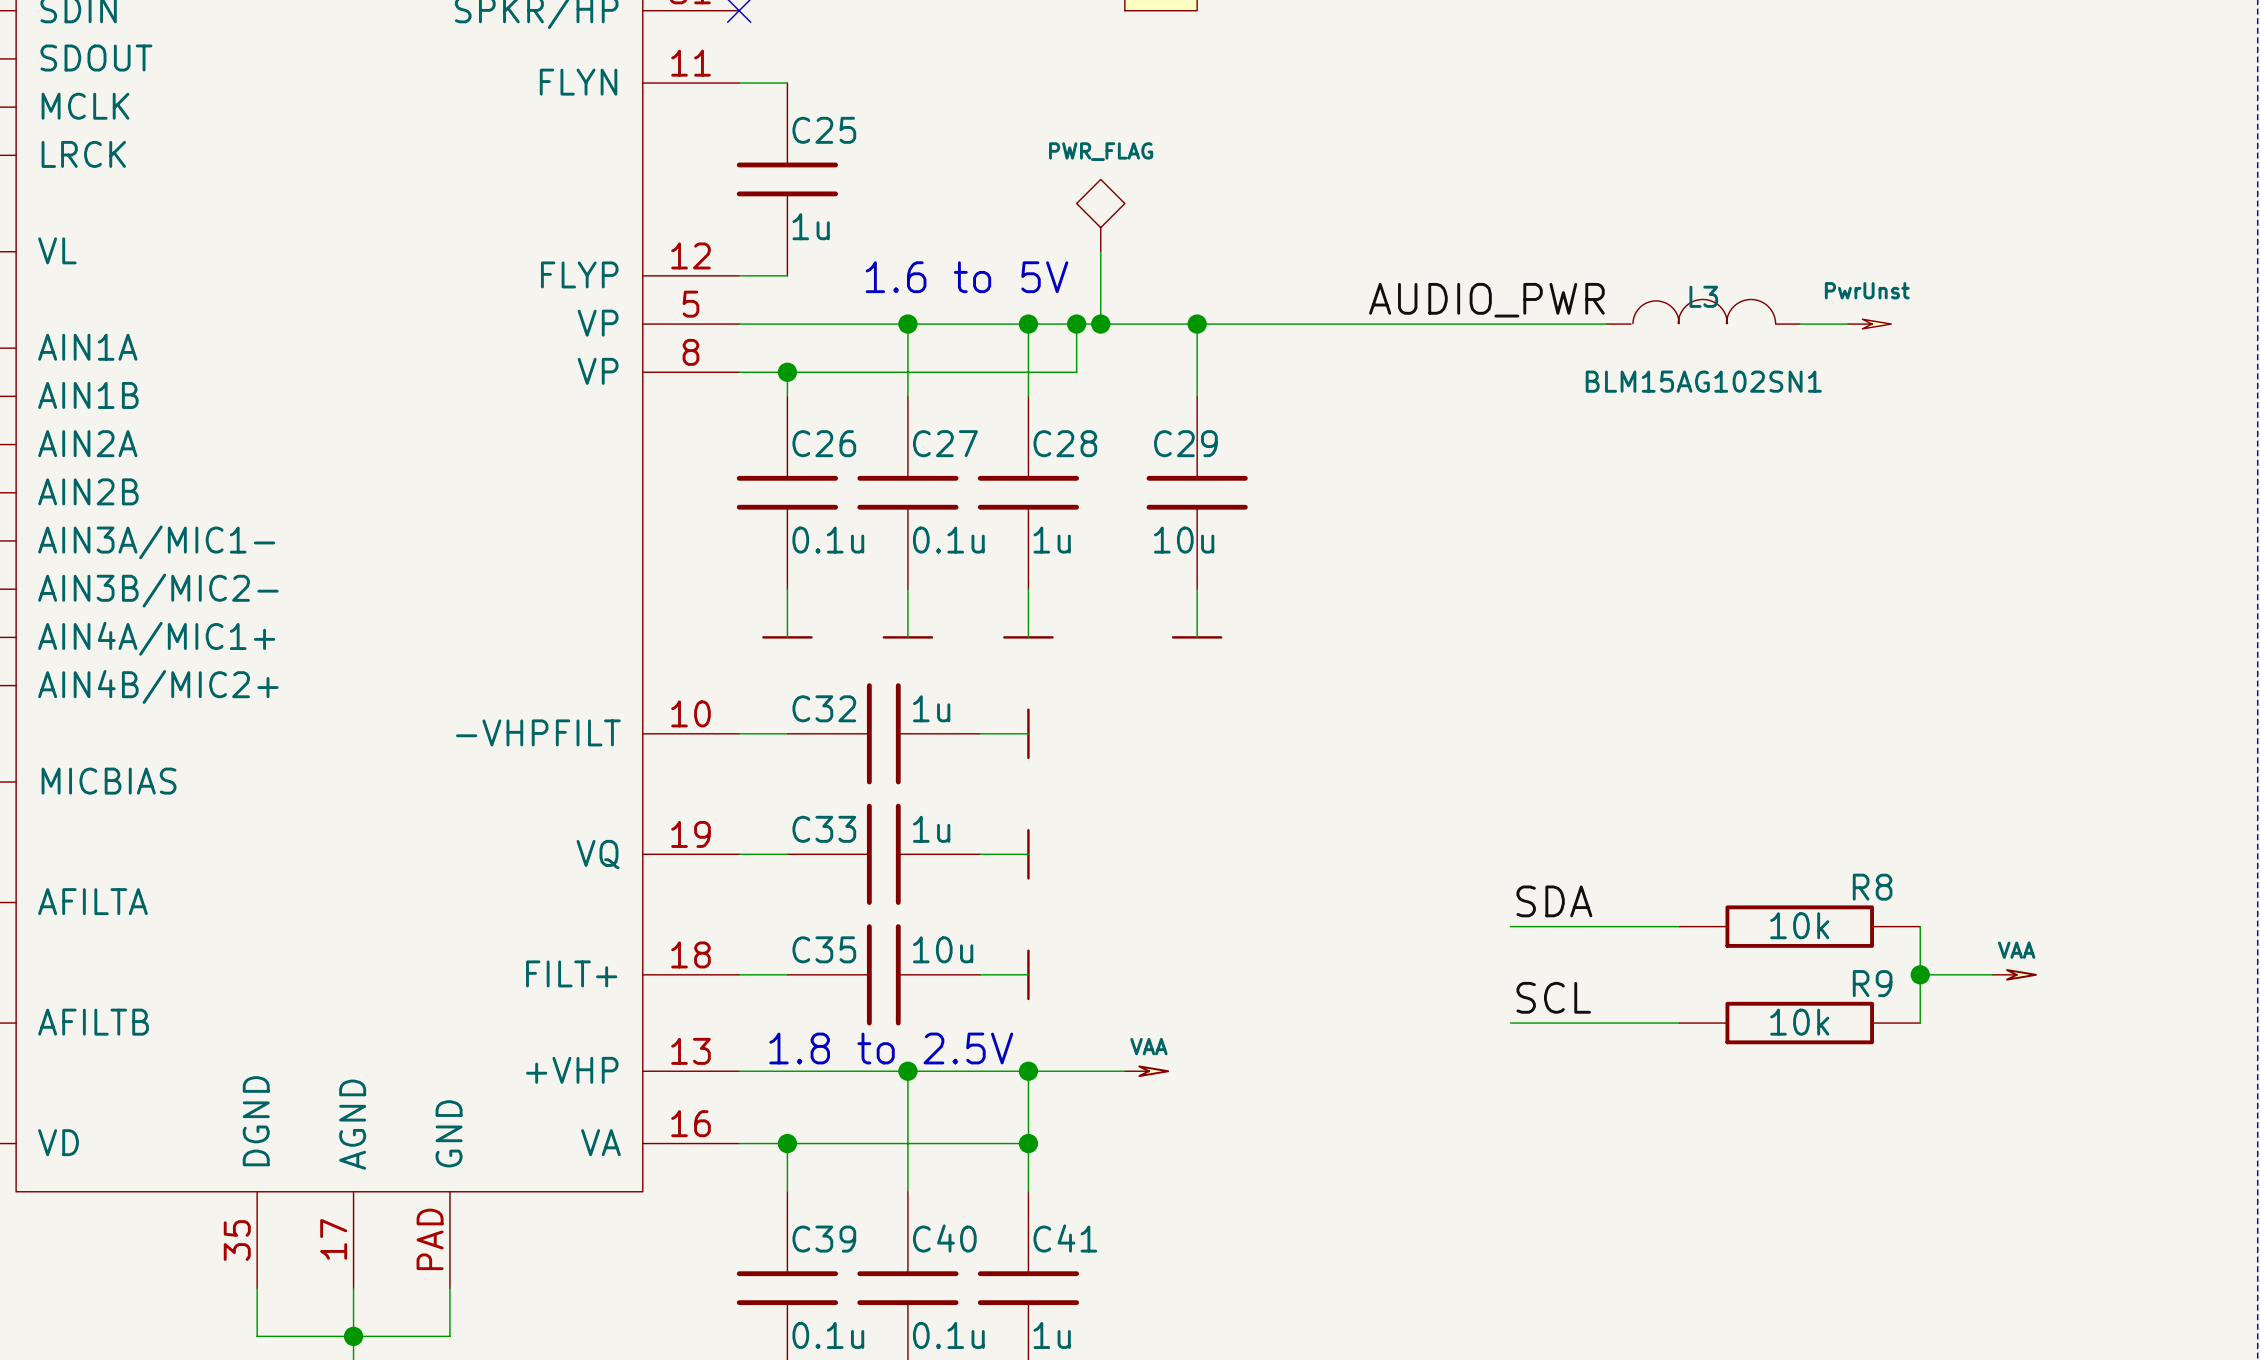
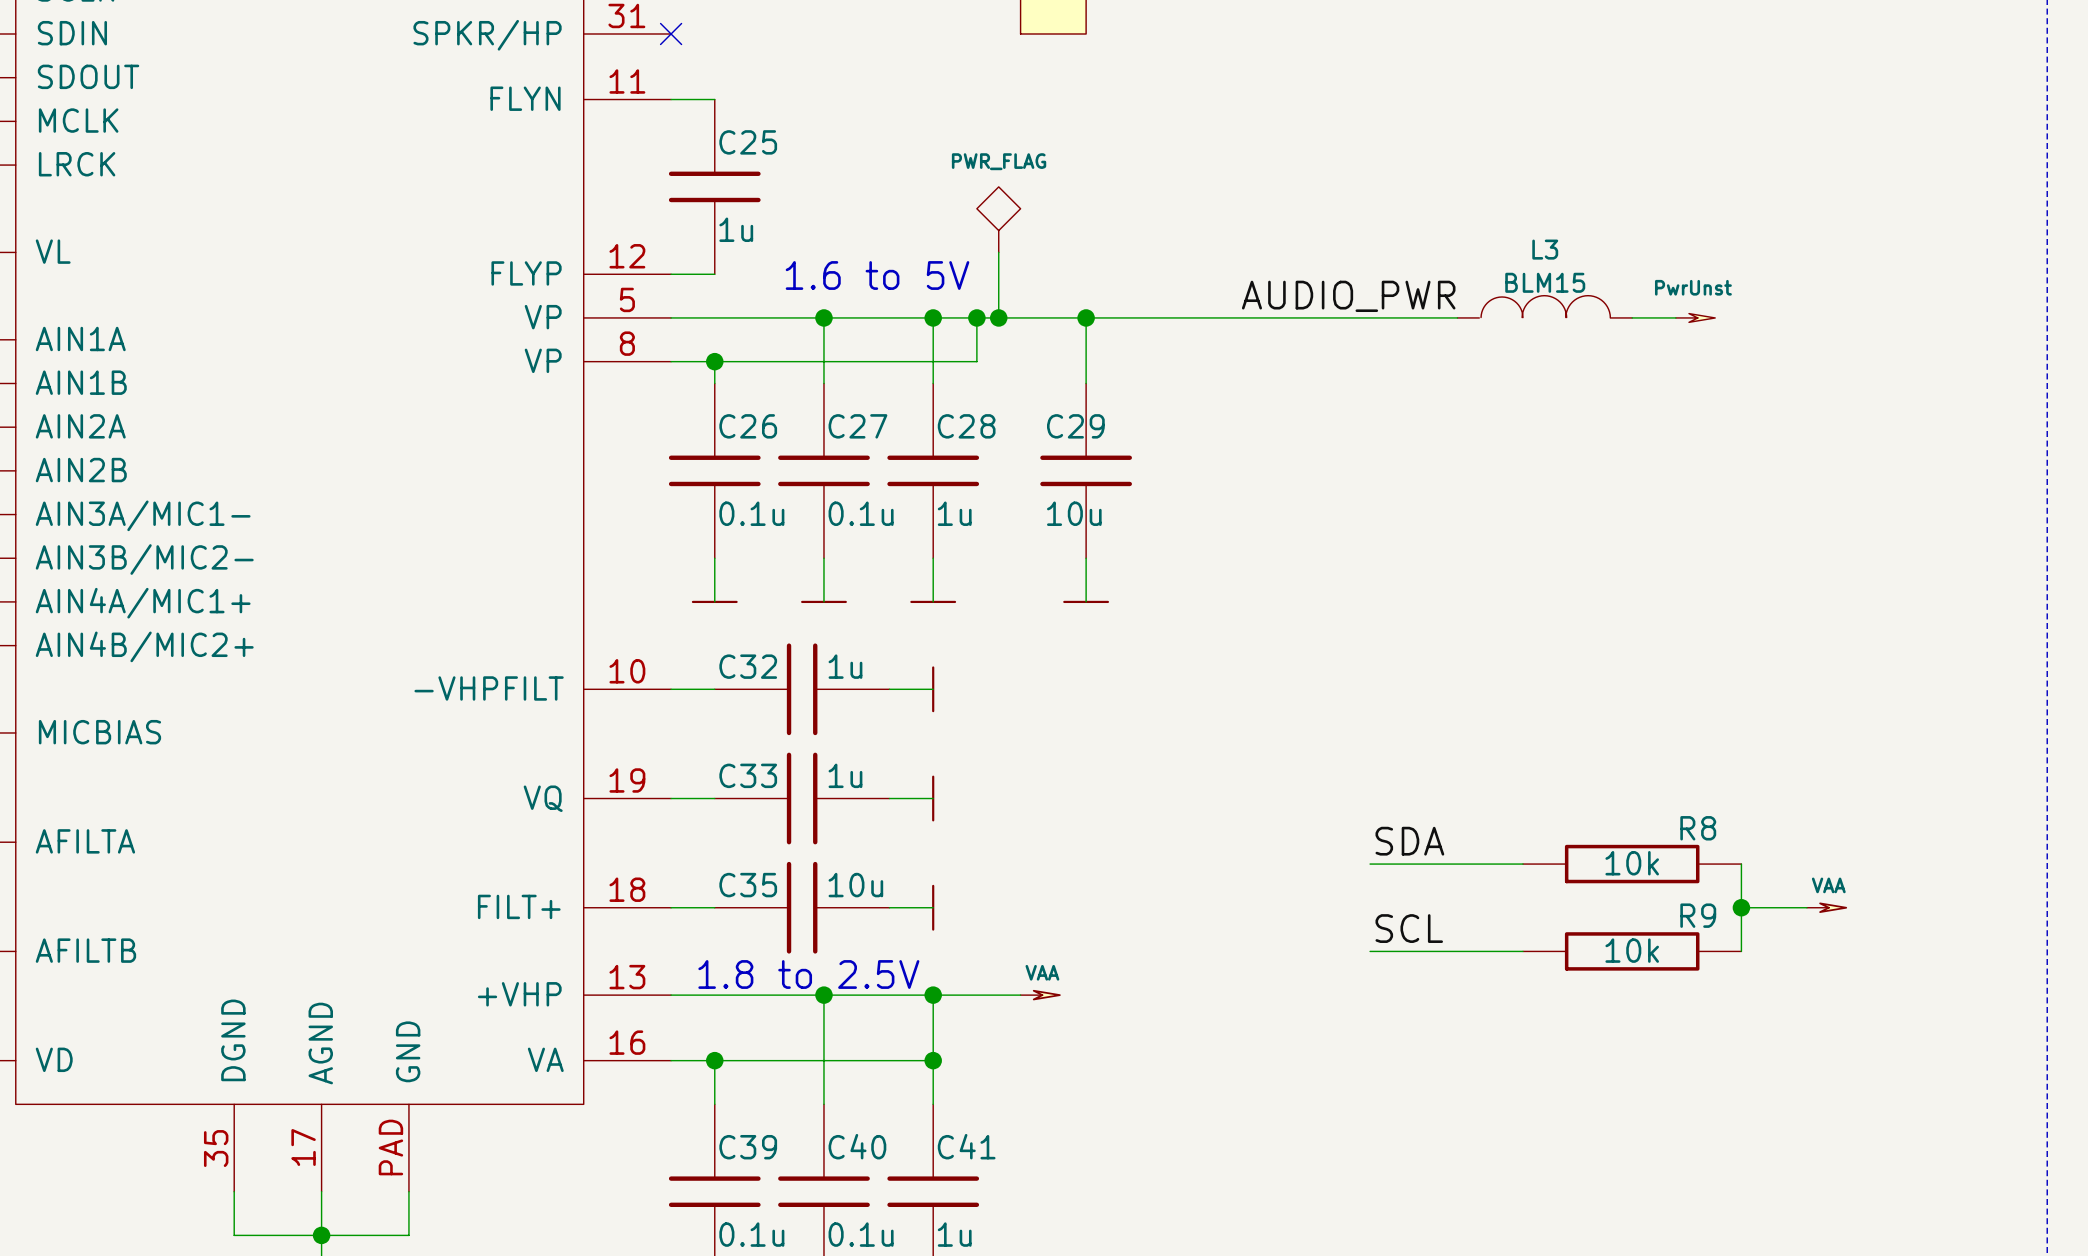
L3 name position: L3 (1703, 296) -> L3 (1545, 249)
L3 value: BLM15AG102SN1 (1703, 381) -> BLM15 (1545, 282)

